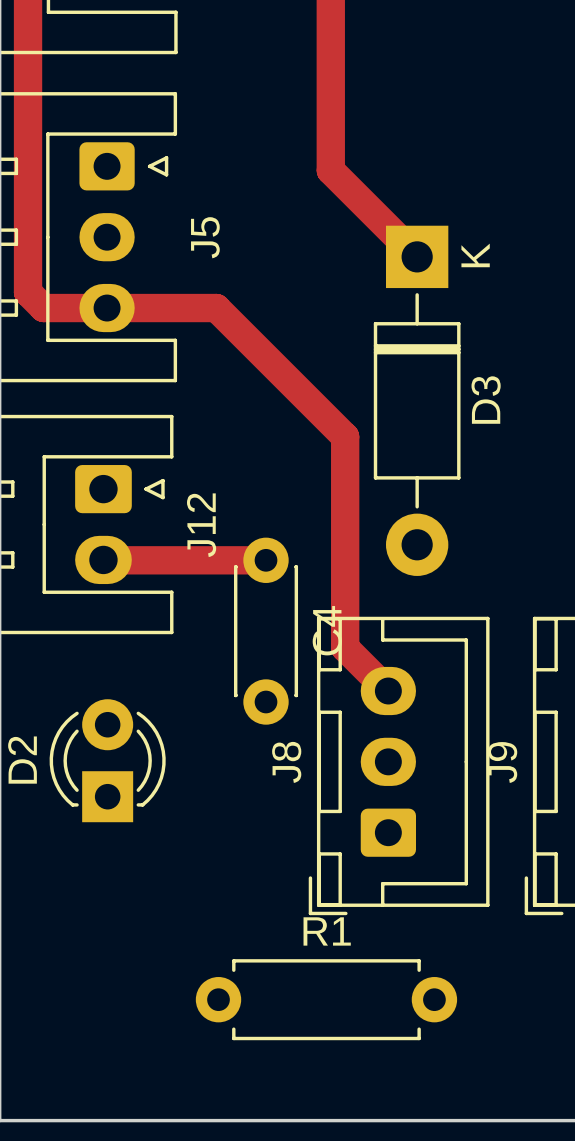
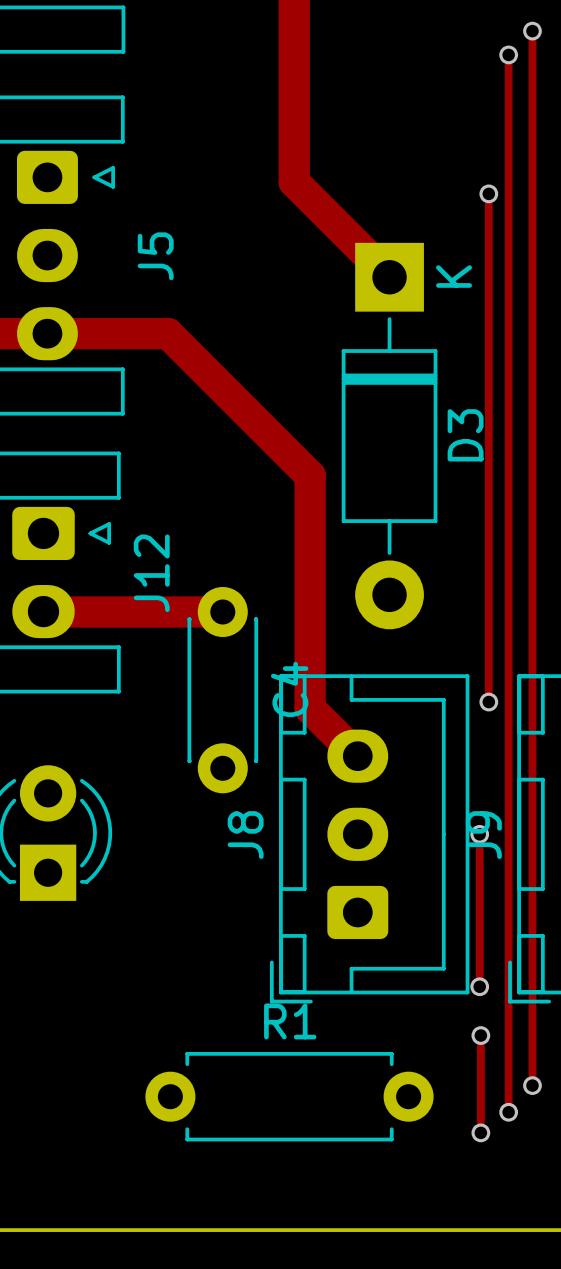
track: none -> (532, 31) (532, 1085)
via: none -> (532, 31)
track: none -> (508, 54) (508, 1112)
via: none -> (508, 54)
track: none -> (488, 193) (488, 702)
via: none -> (488, 193)
via: none -> (488, 702)
track: none -> (479, 834) (479, 986)
via: none -> (479, 834)
via: none -> (479, 986)
track: none -> (480, 1035) (480, 1132)
via: none -> (480, 1035)
via: none -> (532, 1085)
via: none -> (508, 1112)
via: none -> (480, 1132)

